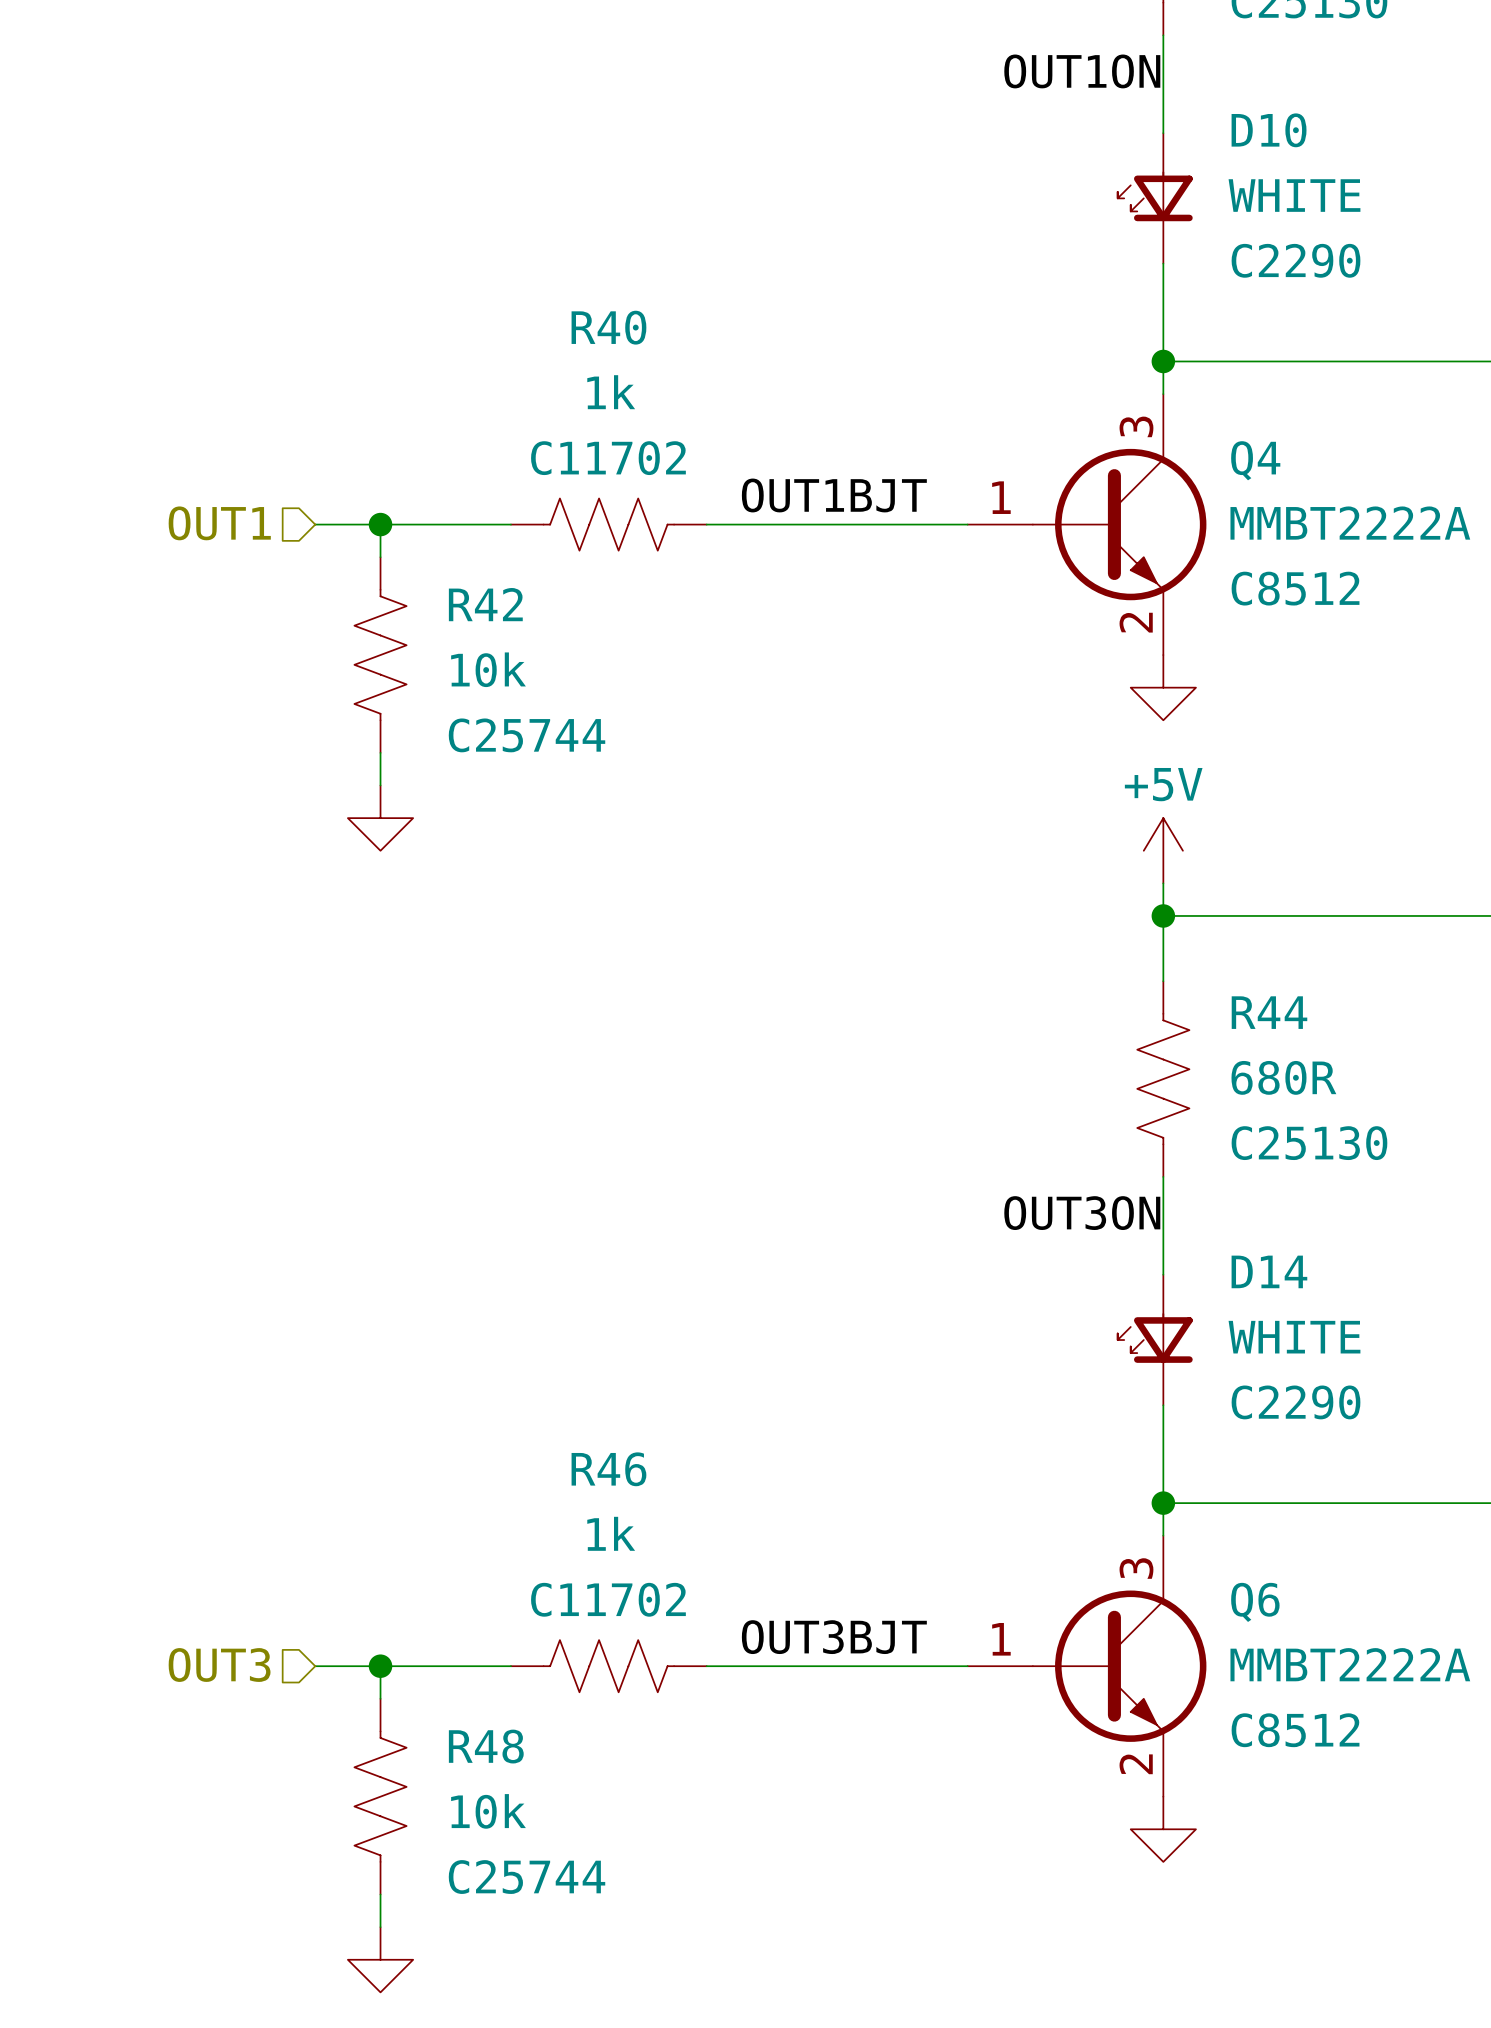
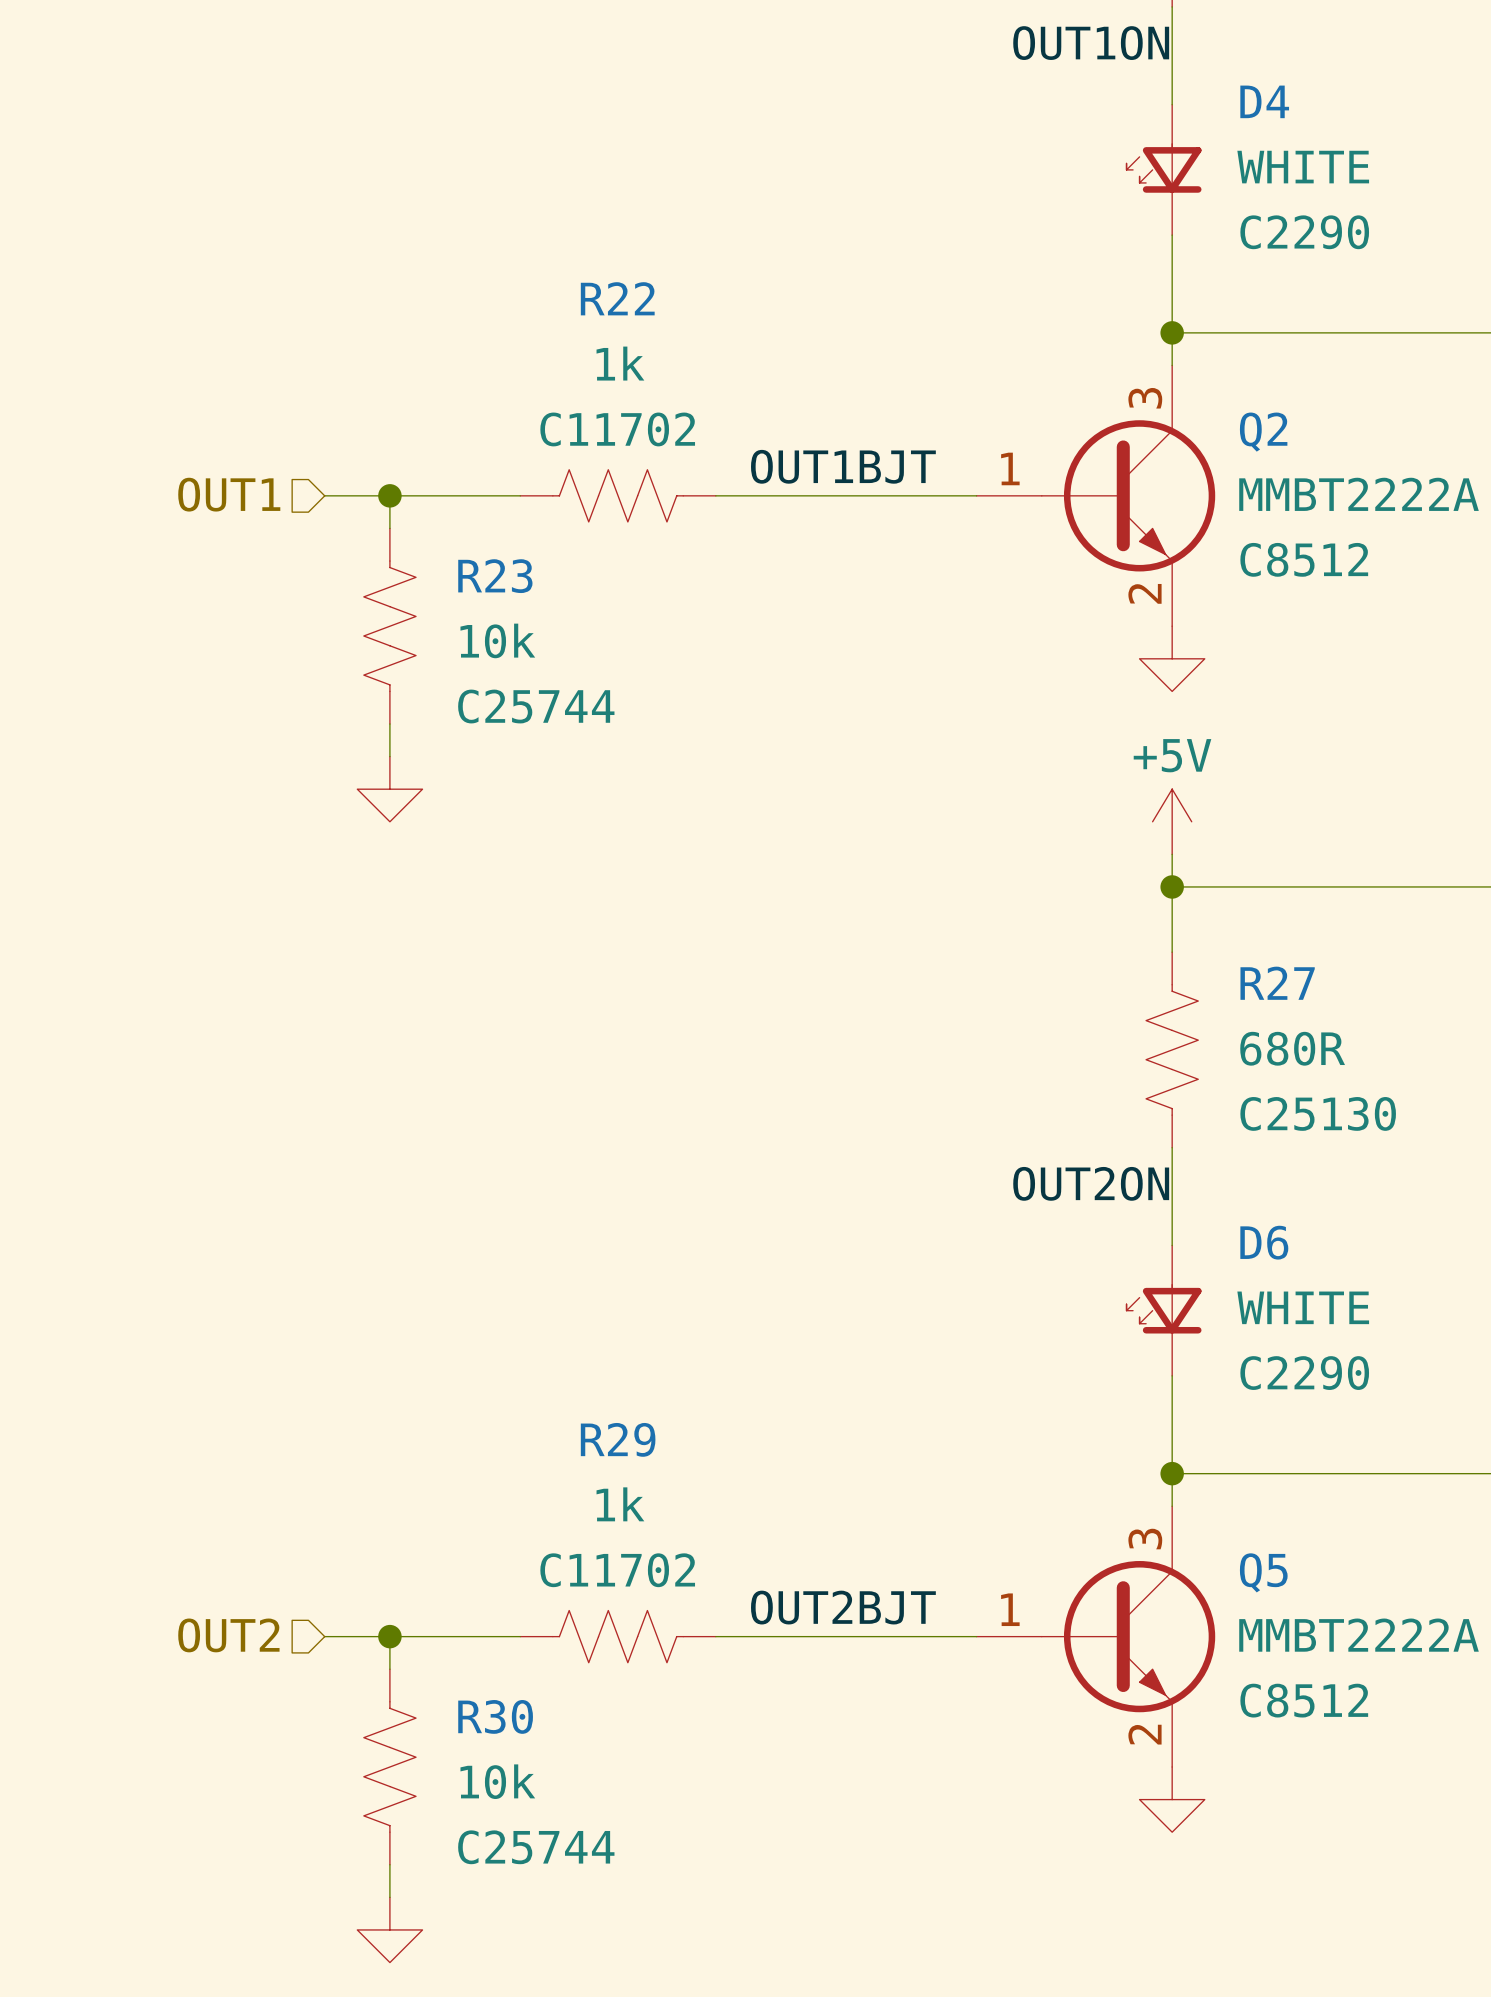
D10 name: D10 (1269, 130) -> D4 (1264, 101)
R40 name: R40 (608, 327) -> R22 (617, 298)
Q4 name: Q4 (1255, 460) -> Q2 (1263, 432)
R42 name: R42 (485, 604) -> R23 (495, 576)
R44 name: R44 (1269, 1012) -> R27 (1277, 983)
label: OUT3ON (1082, 1213) -> OUT2ON (1091, 1183)
D14 name: D14 (1269, 1271) -> D6 (1264, 1242)
R46 name: R46 (608, 1469) -> R29 (618, 1439)
Q6 name: Q6 (1255, 1602) -> Q5 (1263, 1572)
label: OUT3BJT (834, 1637) -> OUT2BJT (843, 1607)
hierarchical label: OUT3 (219, 1665) -> OUT2 (228, 1635)
R48 name: R48 (486, 1746) -> R30 (495, 1716)

